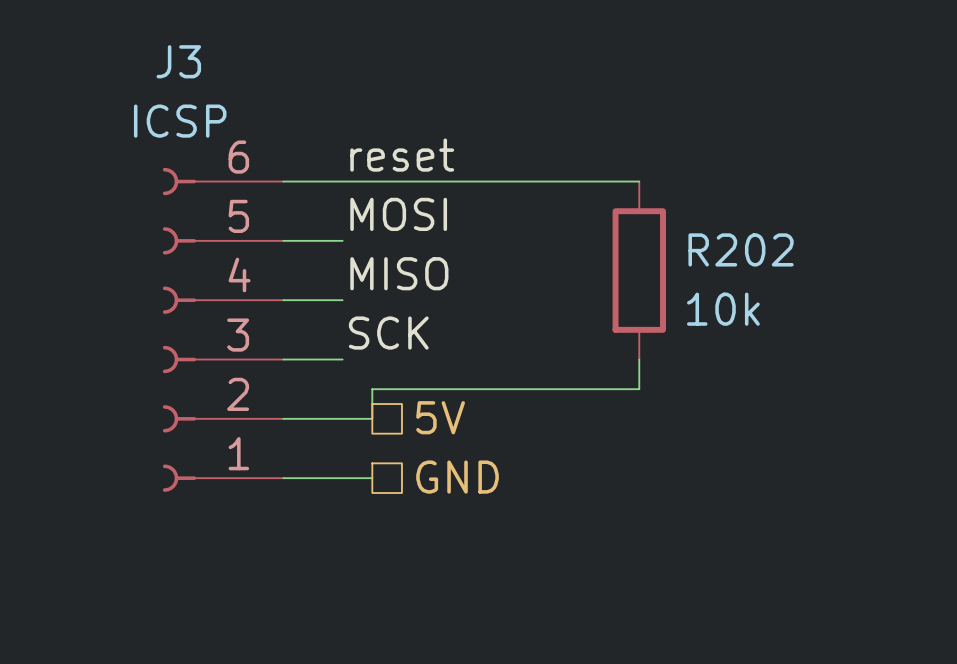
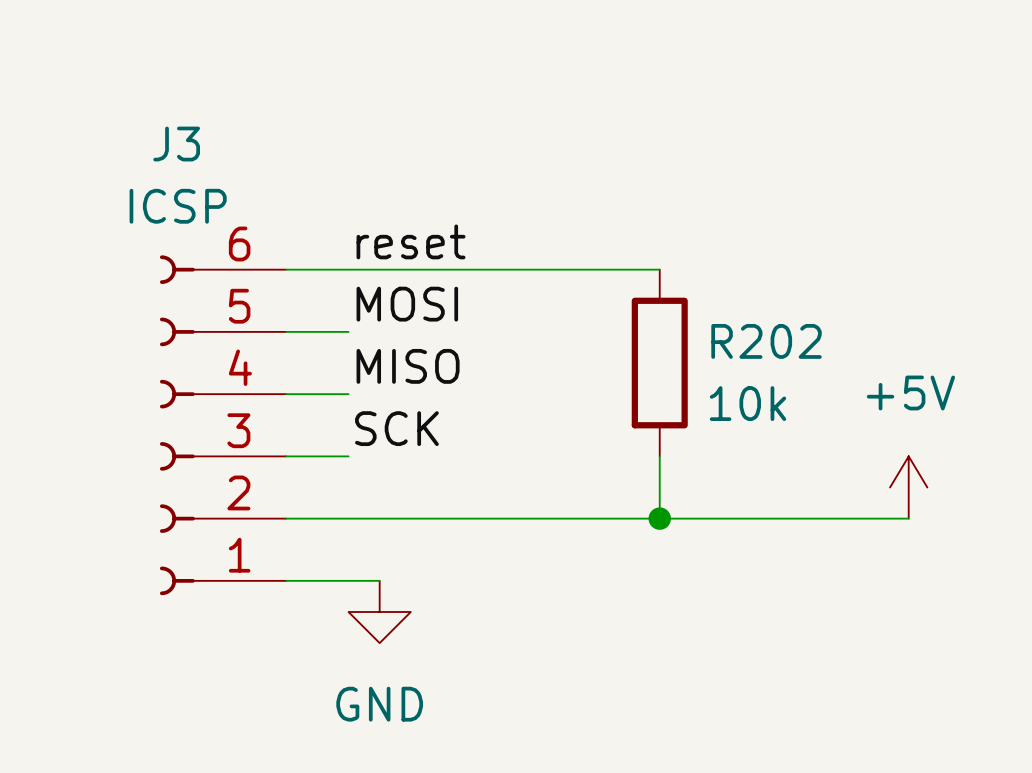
wire: (639, 389) (372, 389) (372, 418) -> (908, 518) (379, 518)
wire: none -> (659, 487) (659, 518)
power symbol: none -> +5V (908, 487)
hierarchical label: 5V (440, 417) -> none
junction: none -> (659, 518)
hierarchical label: GND (457, 477) -> none
power symbol: none -> GND (379, 611)

